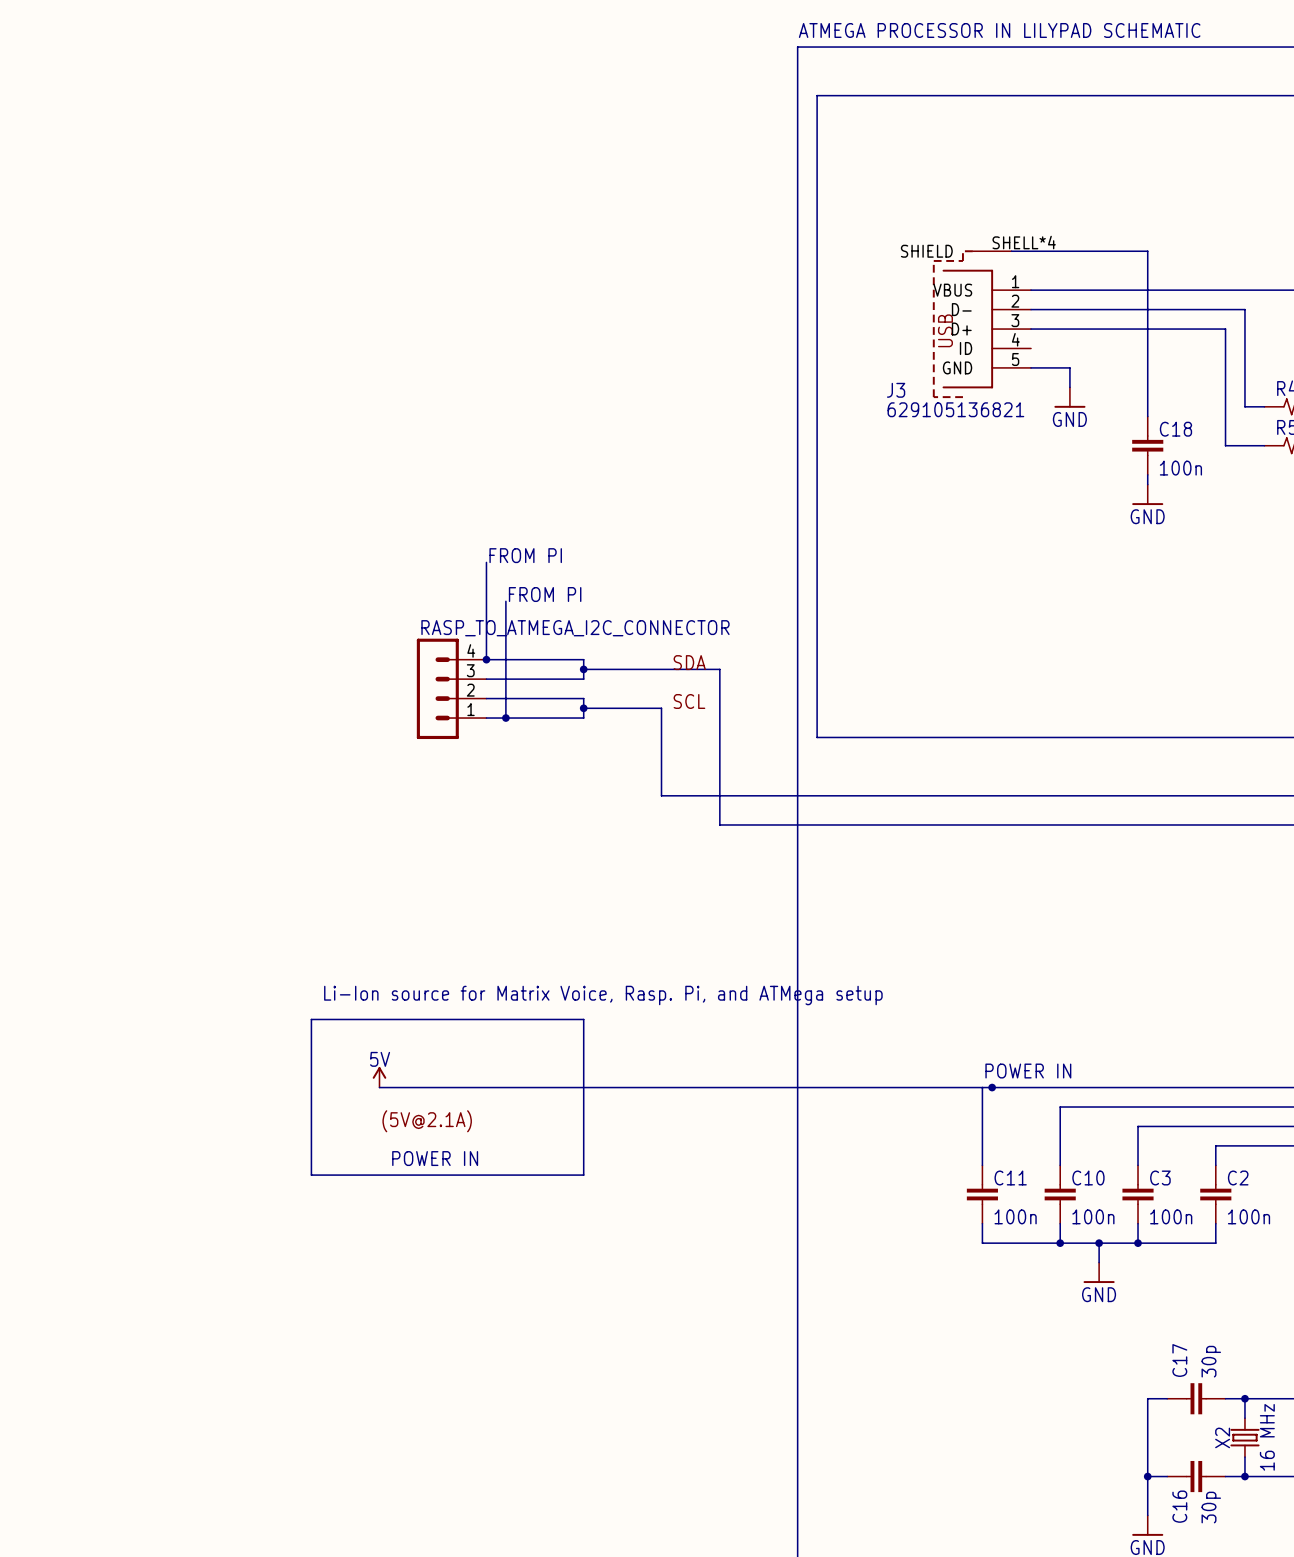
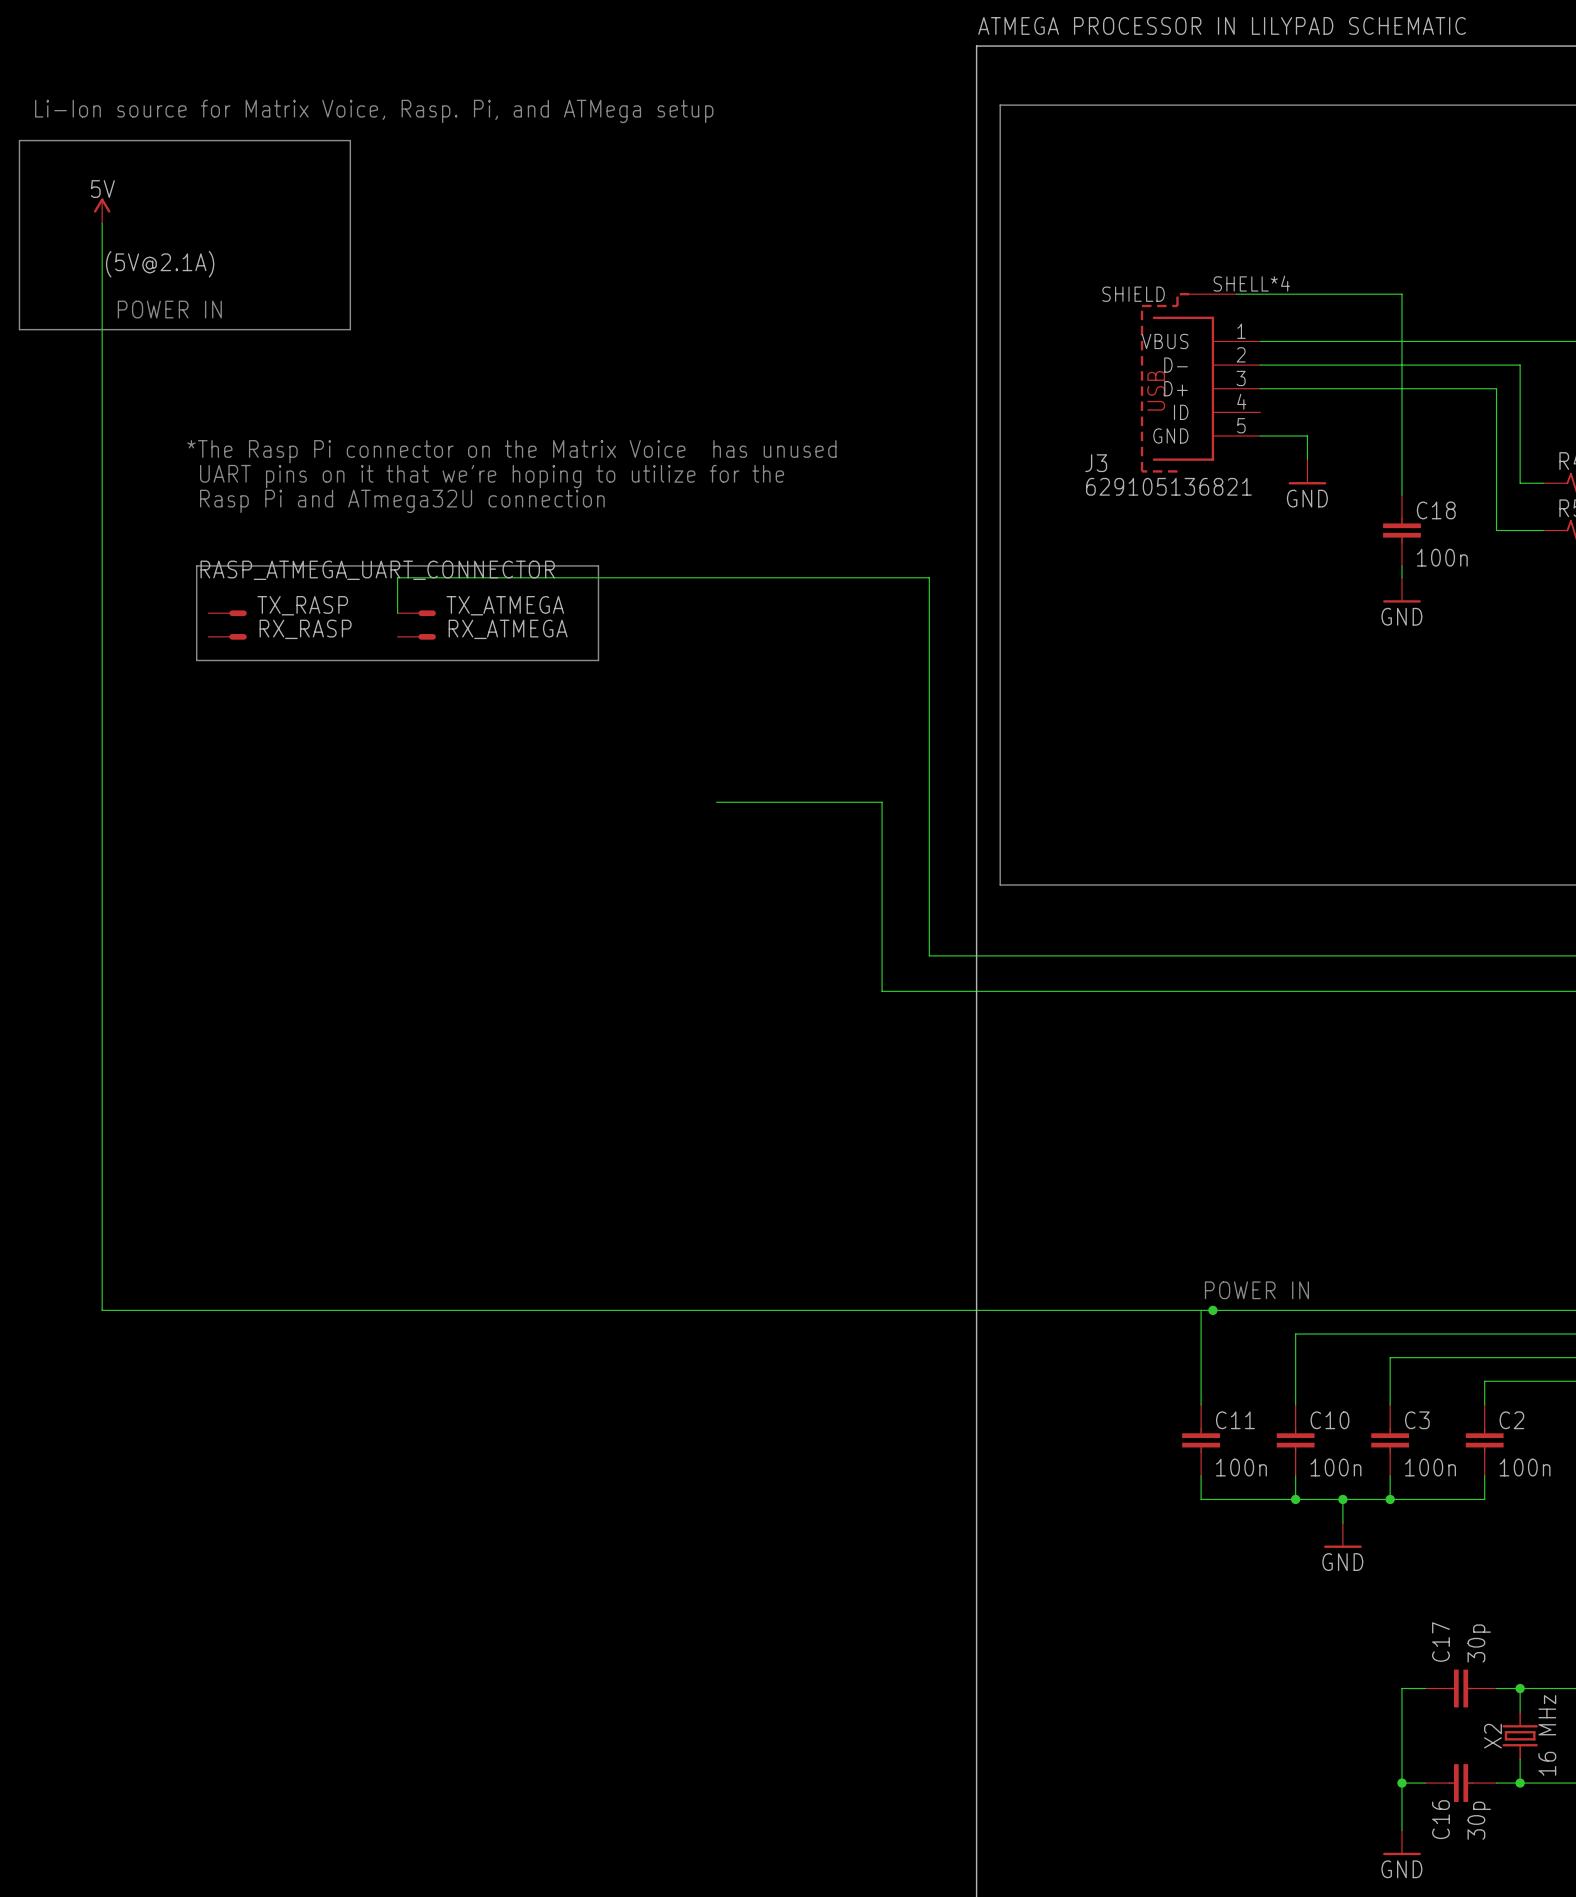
text: none -> Li-Ion source for Matrix Voice, Rasp. Pi, and ATMega setup (374, 111)
line: none -> (19, 140) (350, 140) (350, 329) (19, 329) (19, 140)
power symbol: none -> 5V (102, 210)
wire: none -> (102, 223) (102, 1310) (468, 1310)
label: none -> (5V@2.1A) (160, 264)
text: none -> POWER IN (169, 309)
text: none -> *The Rasp Pi connector on the Matrix Voice has unused (511, 451)
text: none -> UART pins on it that we're hoping to utilize for the (492, 476)
text: none -> Rasp Pi and ATmega32U connection (402, 501)
line: none -> (196, 565) (196, 660) (598, 660) (598, 565) (196, 565)
text: none -> RASP_ATMEGA_UART_CONNECTOR (377, 570)
text: none -> TX_RASP (302, 605)
text: none -> TX_ATMEGA (505, 605)
part: none -> (227, 613)
part: none -> (416, 613)
text: none -> RX_RASP (305, 629)
text: none -> RX_ATMEGA (508, 629)
part: none -> (227, 636)
part: none -> (416, 636)
text: FROM PI (525, 555) -> none
wire: (486, 562) (486, 659) (583, 659) (583, 679) (486, 679) -> none
text: FROM PI (545, 594) -> none
wire: (505, 601) (505, 718) -> none
junction: (486, 659) -> none
label: SDA (689, 662) -> none
junction: (583, 669) -> none
RASP_TO_ATMEGA_I2C_CONNECTOR: (451, 688) -> none
wire: (486, 698) (583, 698) (583, 718) (486, 718) -> none
label: SCL (689, 701) -> none
wire: (583, 708) (661, 708) (661, 795) (758, 795) -> (397, 613) (397, 577) (929, 577) (929, 955)
junction: (583, 708) -> none
junction: (505, 718) -> none
text: Li-Ion source for Matrix Voice, Rasp. Pi, and ATMega setup (603, 995) -> none
line: (311, 1019) (583, 1019) (583, 1175) (311, 1175) (311, 1019) -> none
power symbol: 5V (379, 1077) -> none
label: (5V@2.1A) (427, 1121) -> none
text: POWER IN (435, 1158) -> none

